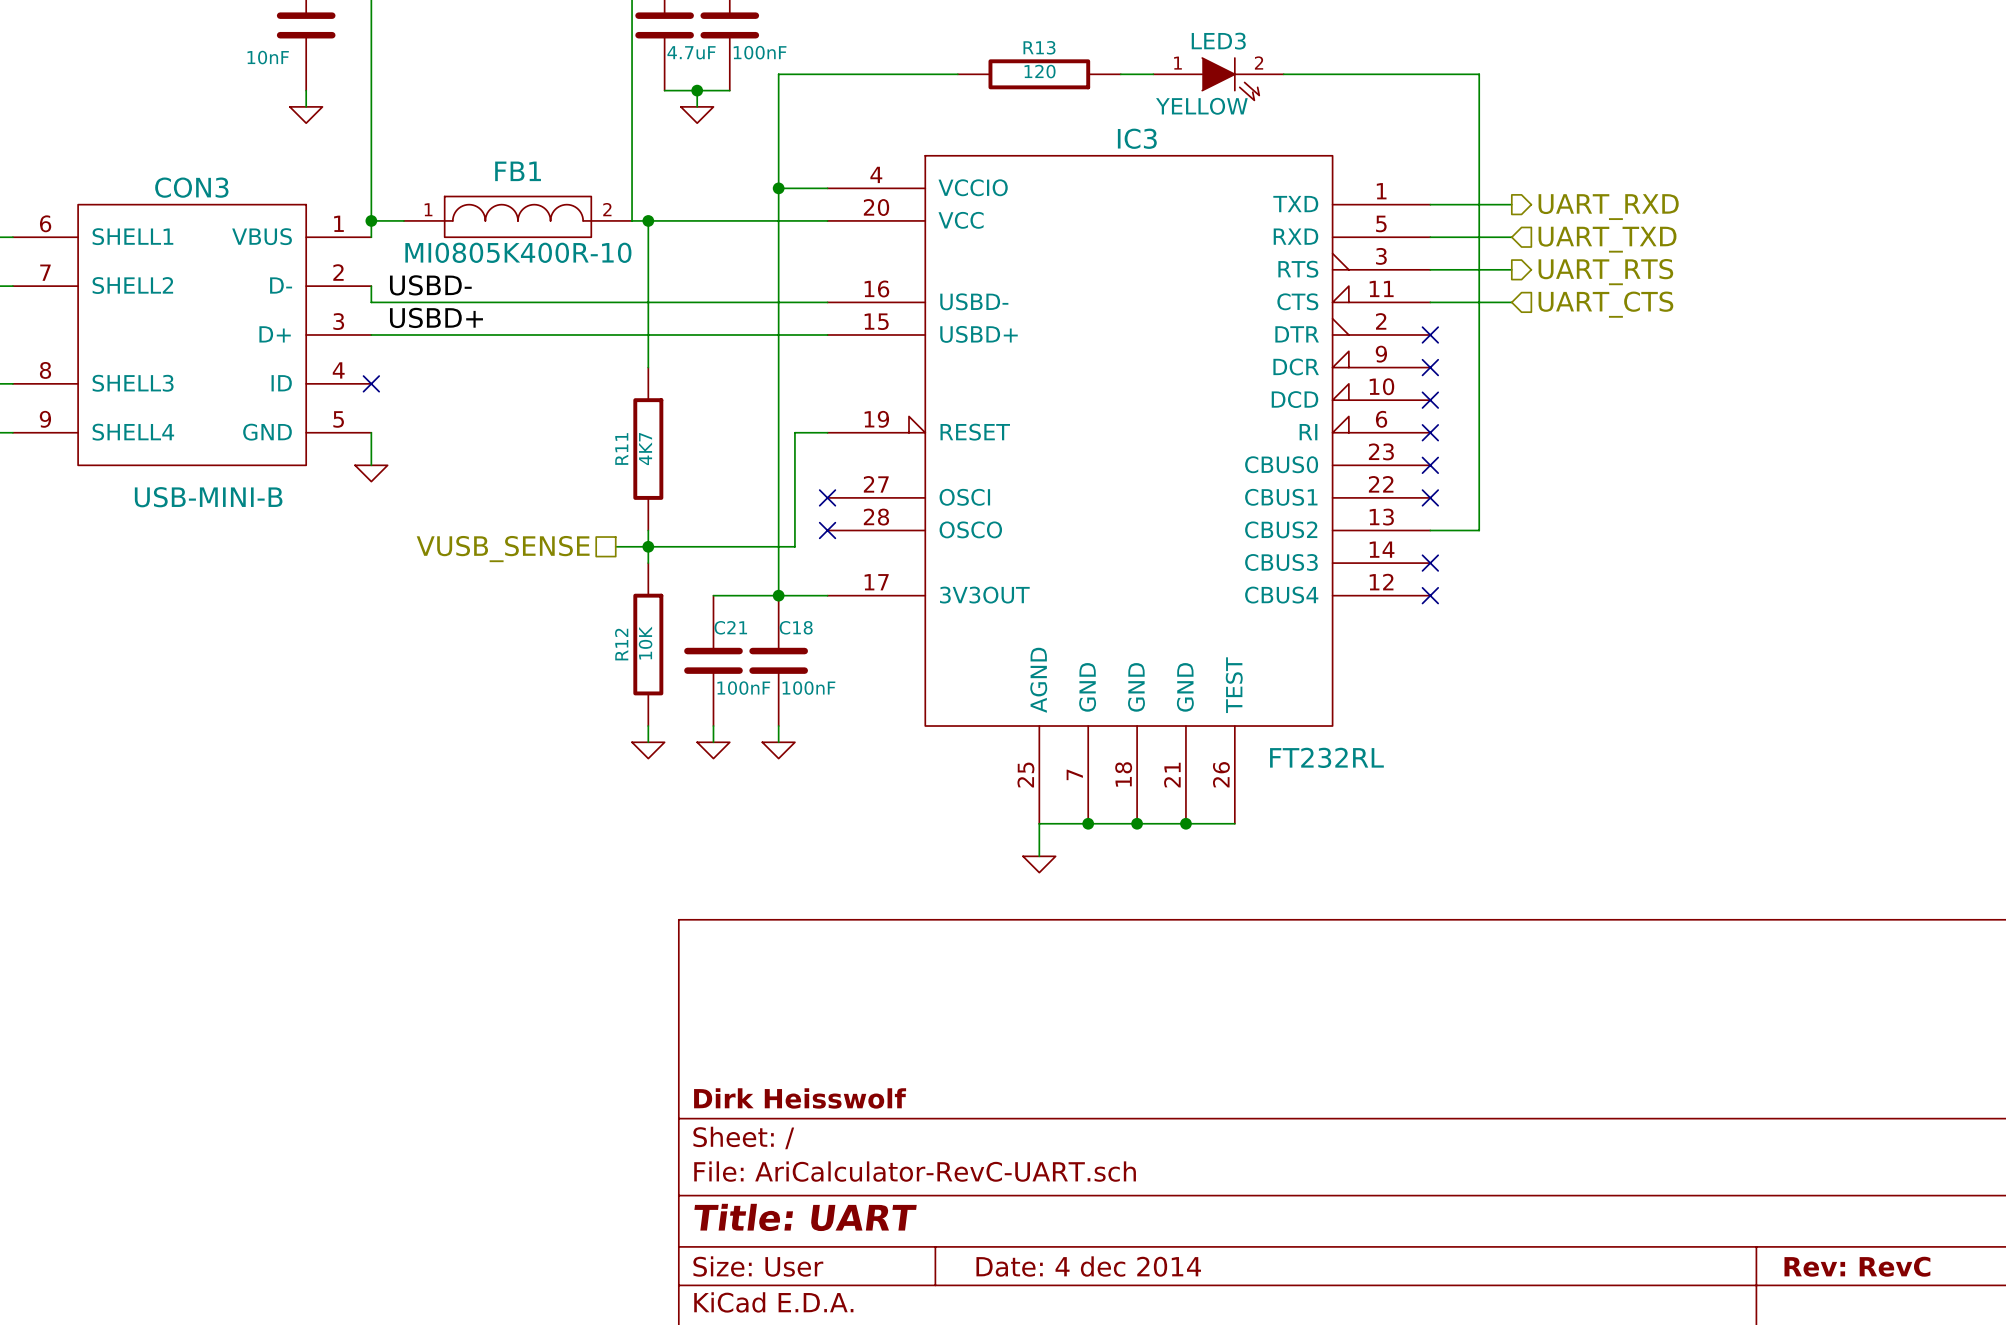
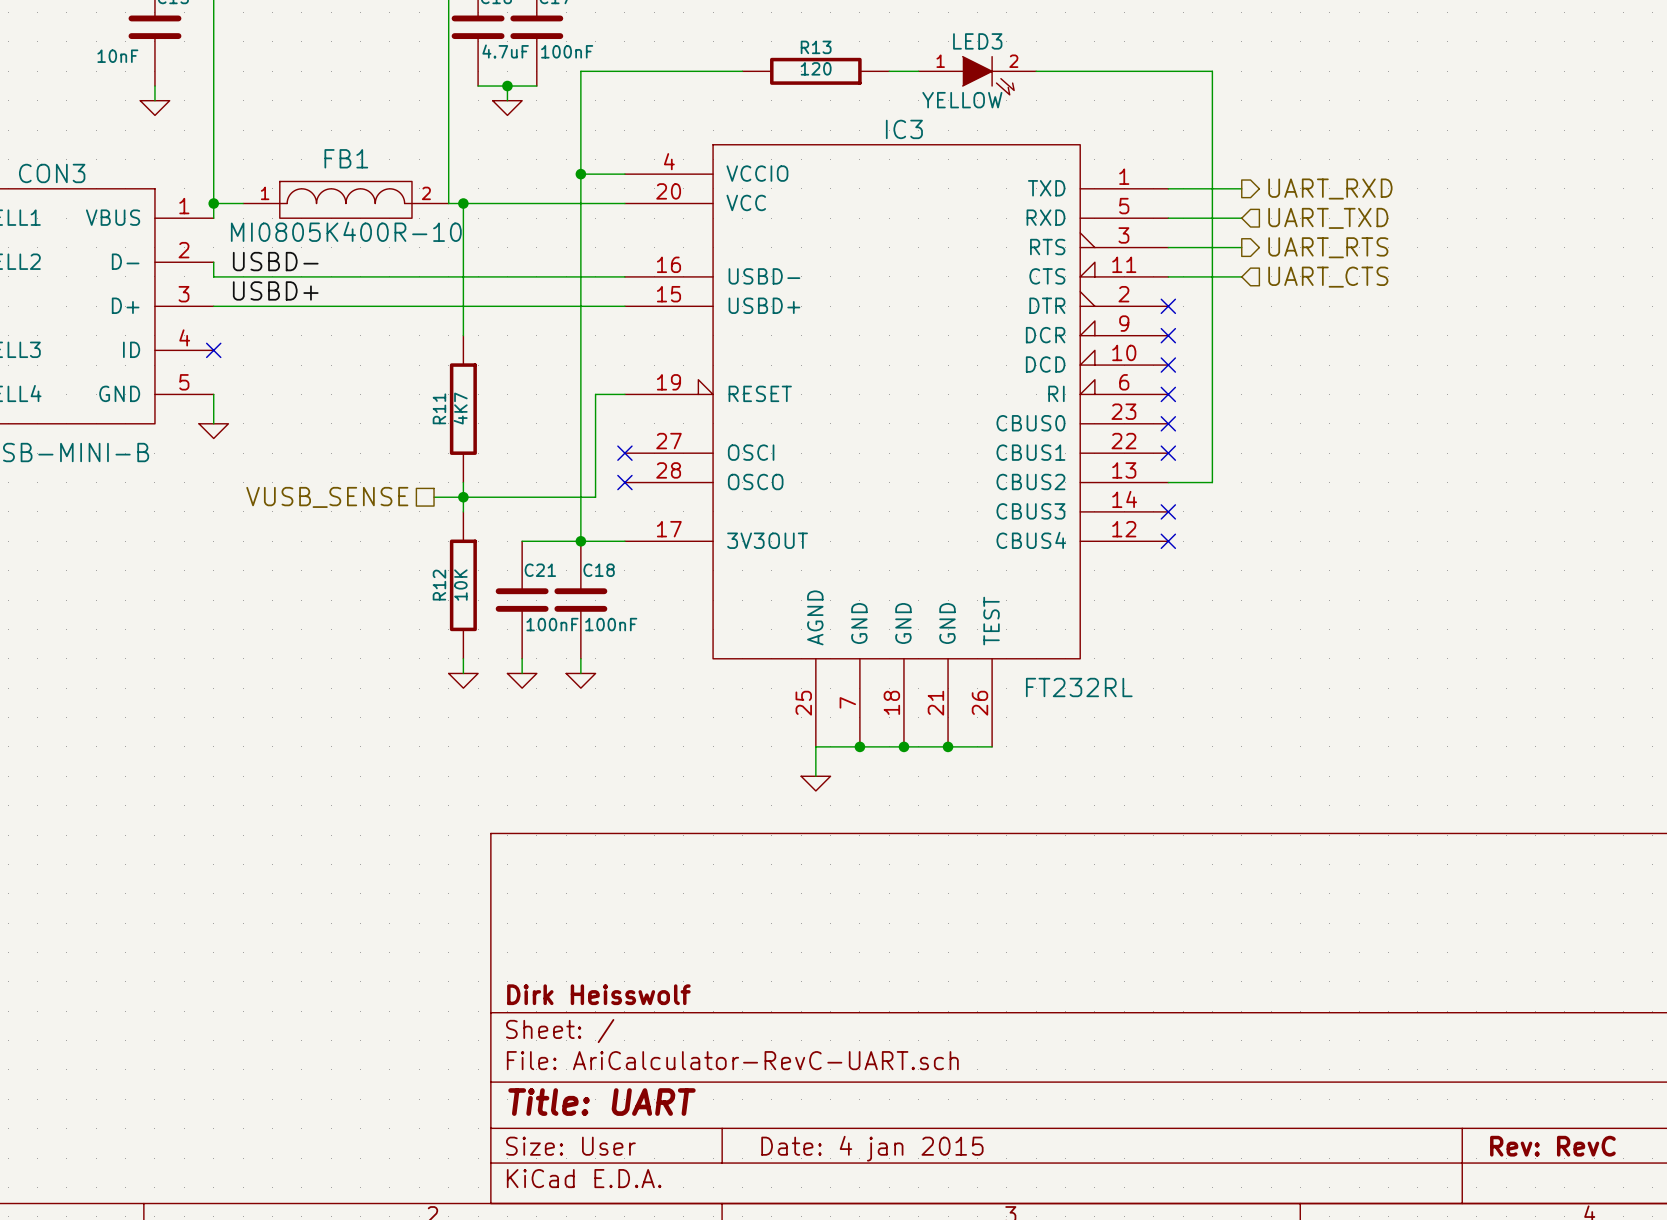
title block: Date: 4 dec 2014 (1088, 1266) -> Date: 4 jan 2015 (872, 1148)

